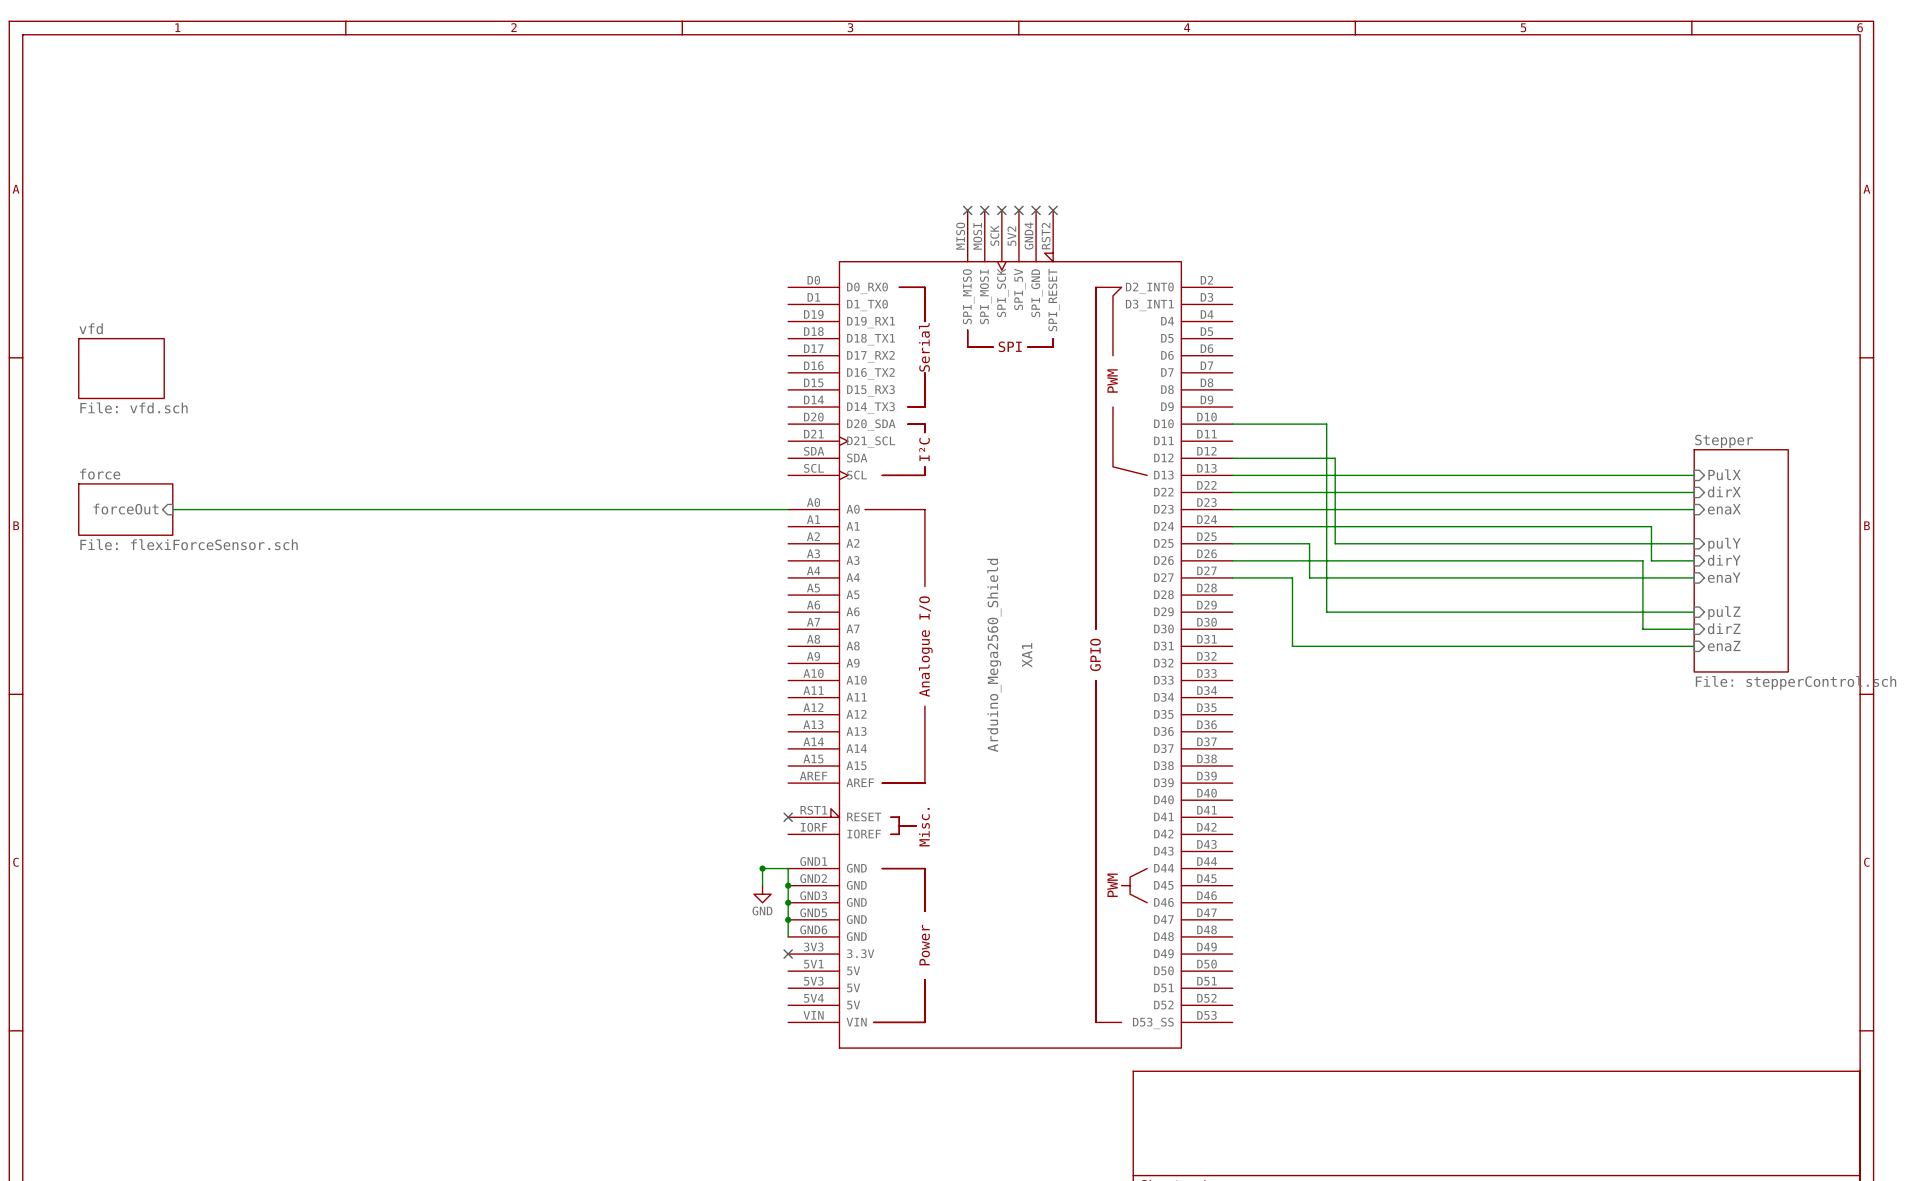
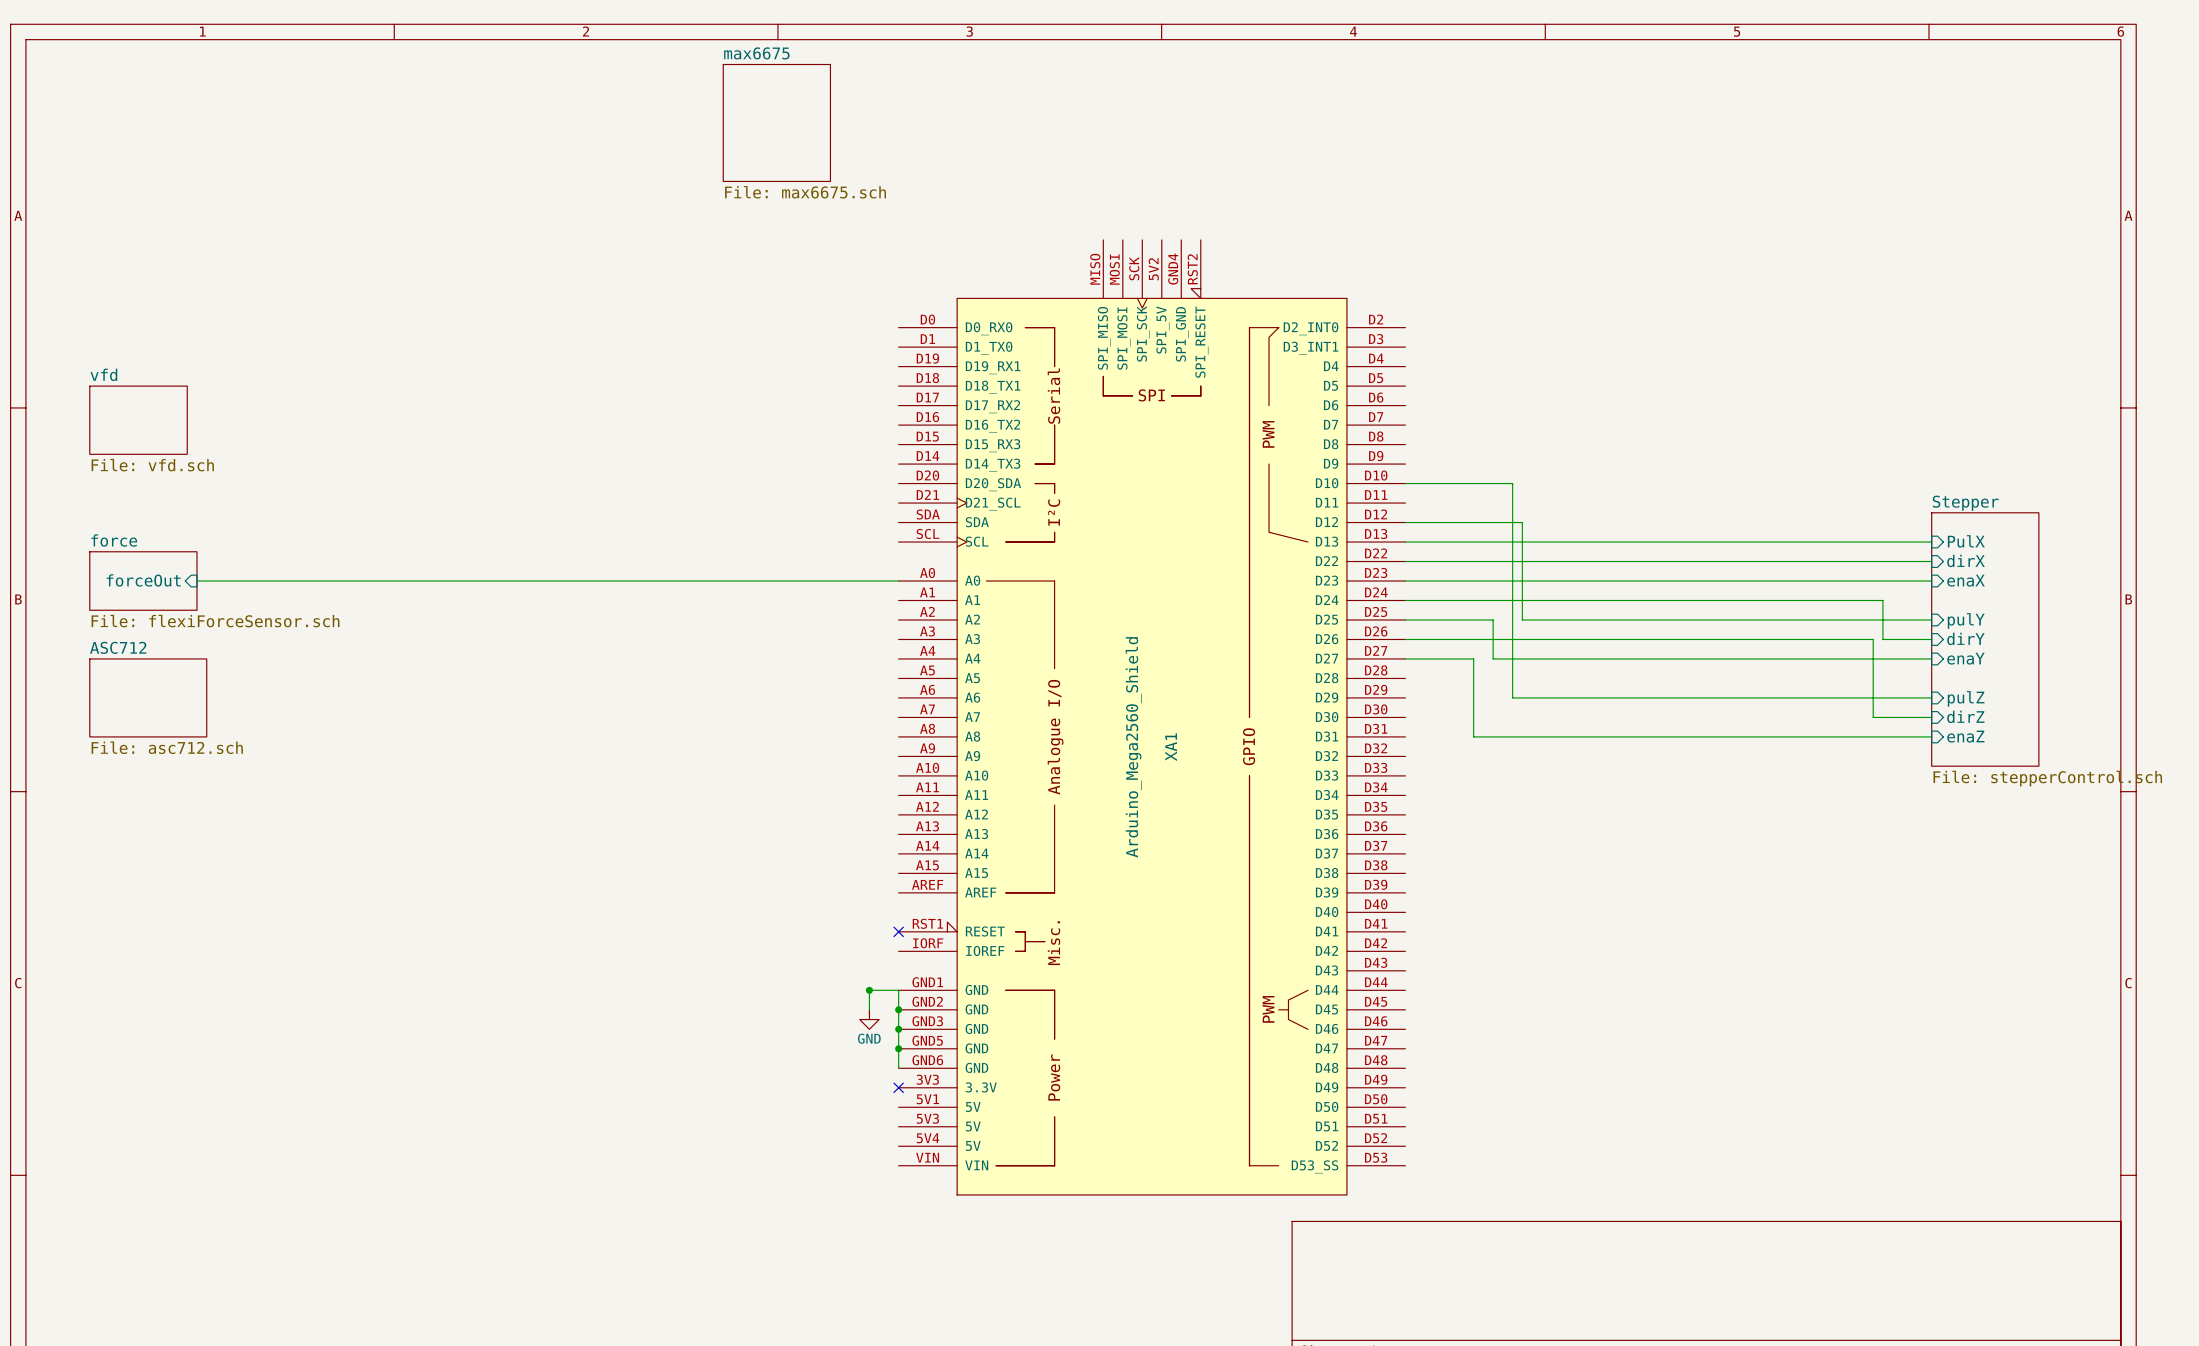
sheet max6675: none -> File: max6675.sch (776, 122)
no-connect mark: (967, 210) -> none
no-connect mark: (984, 210) -> none
no-connect mark: (1001, 210) -> none
no-connect mark: (1018, 210) -> none
no-connect mark: (1036, 210) -> none
no-connect mark: (1053, 210) -> none
sheet ASC712: none -> File: asc712.sch (148, 697)

